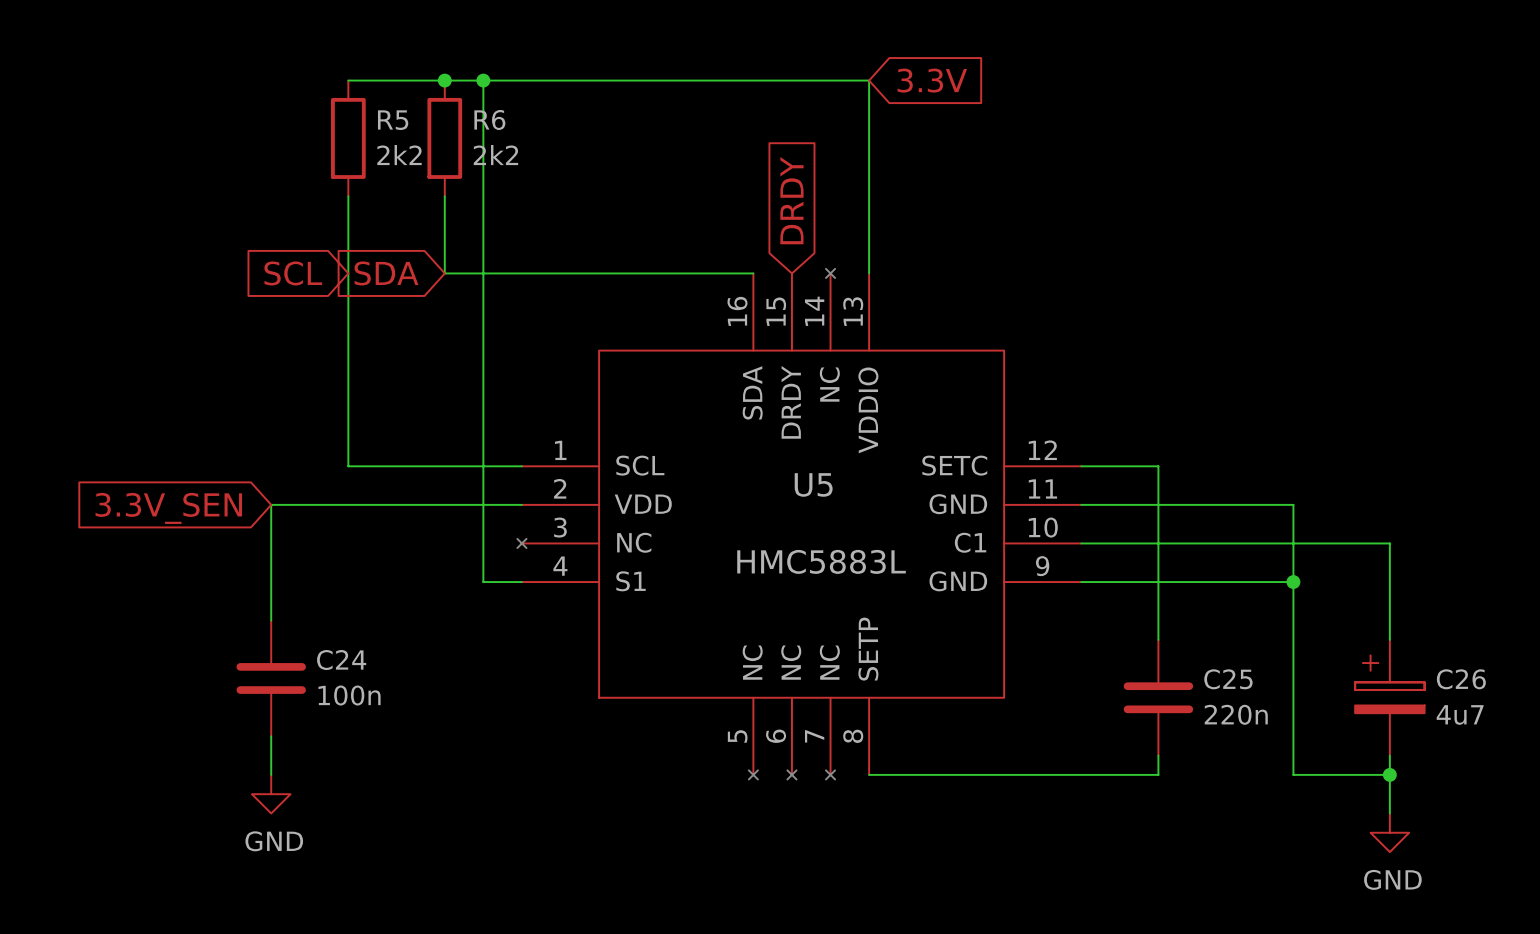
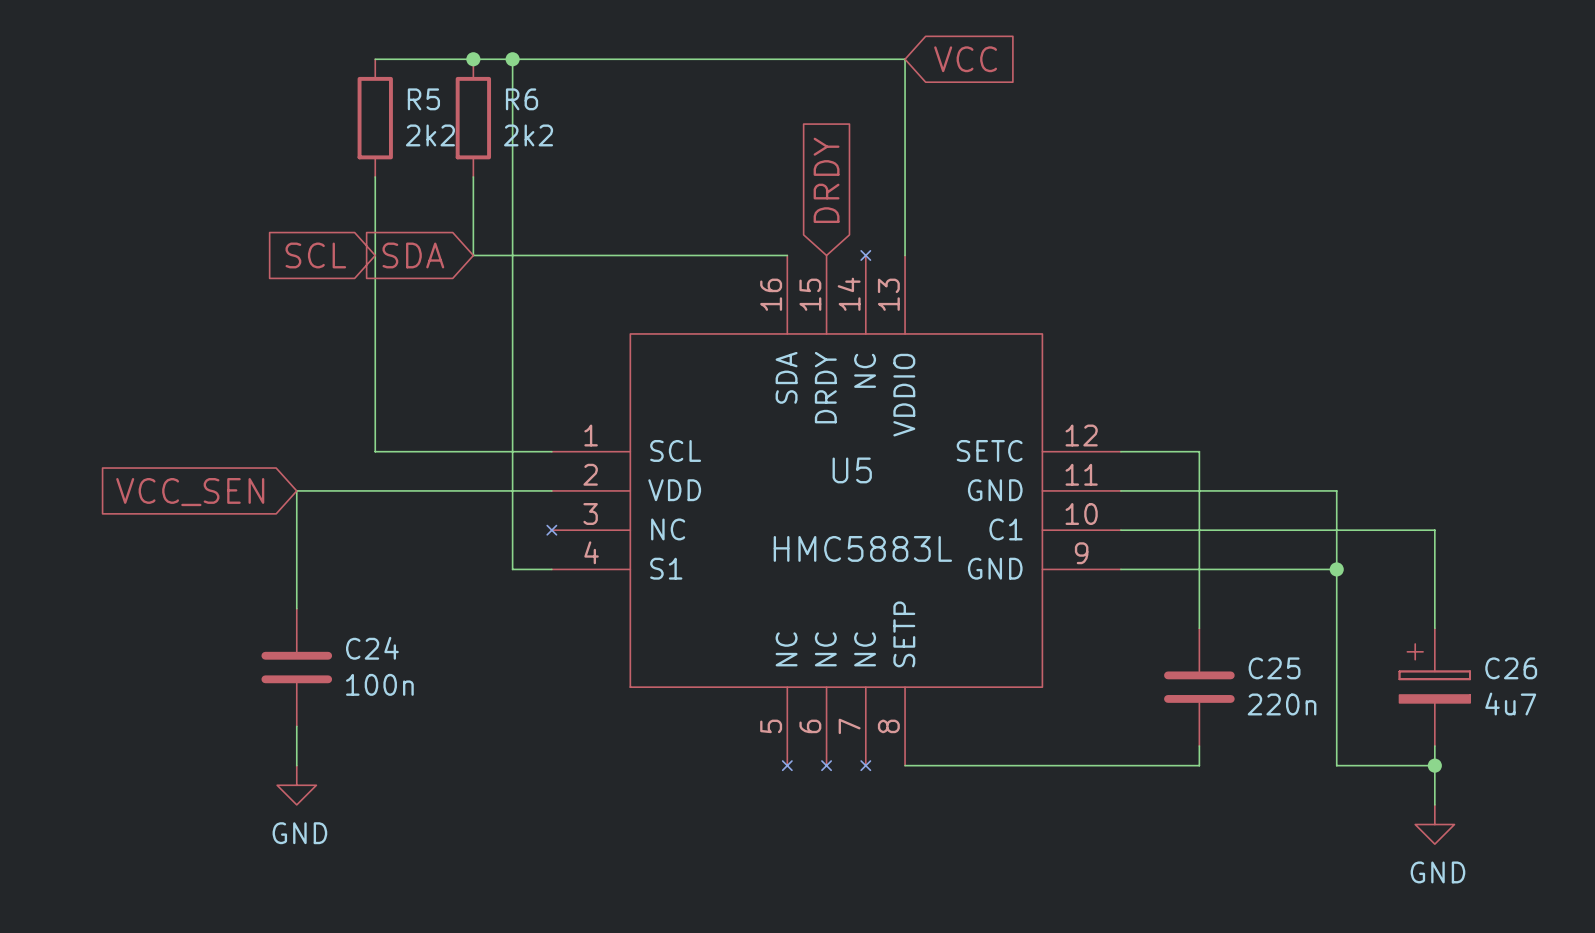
global label: 3.3V (932, 80) -> VCC (965, 59)
global label: 3.3V_SEN (168, 508) -> VCC_SEN (190, 492)

